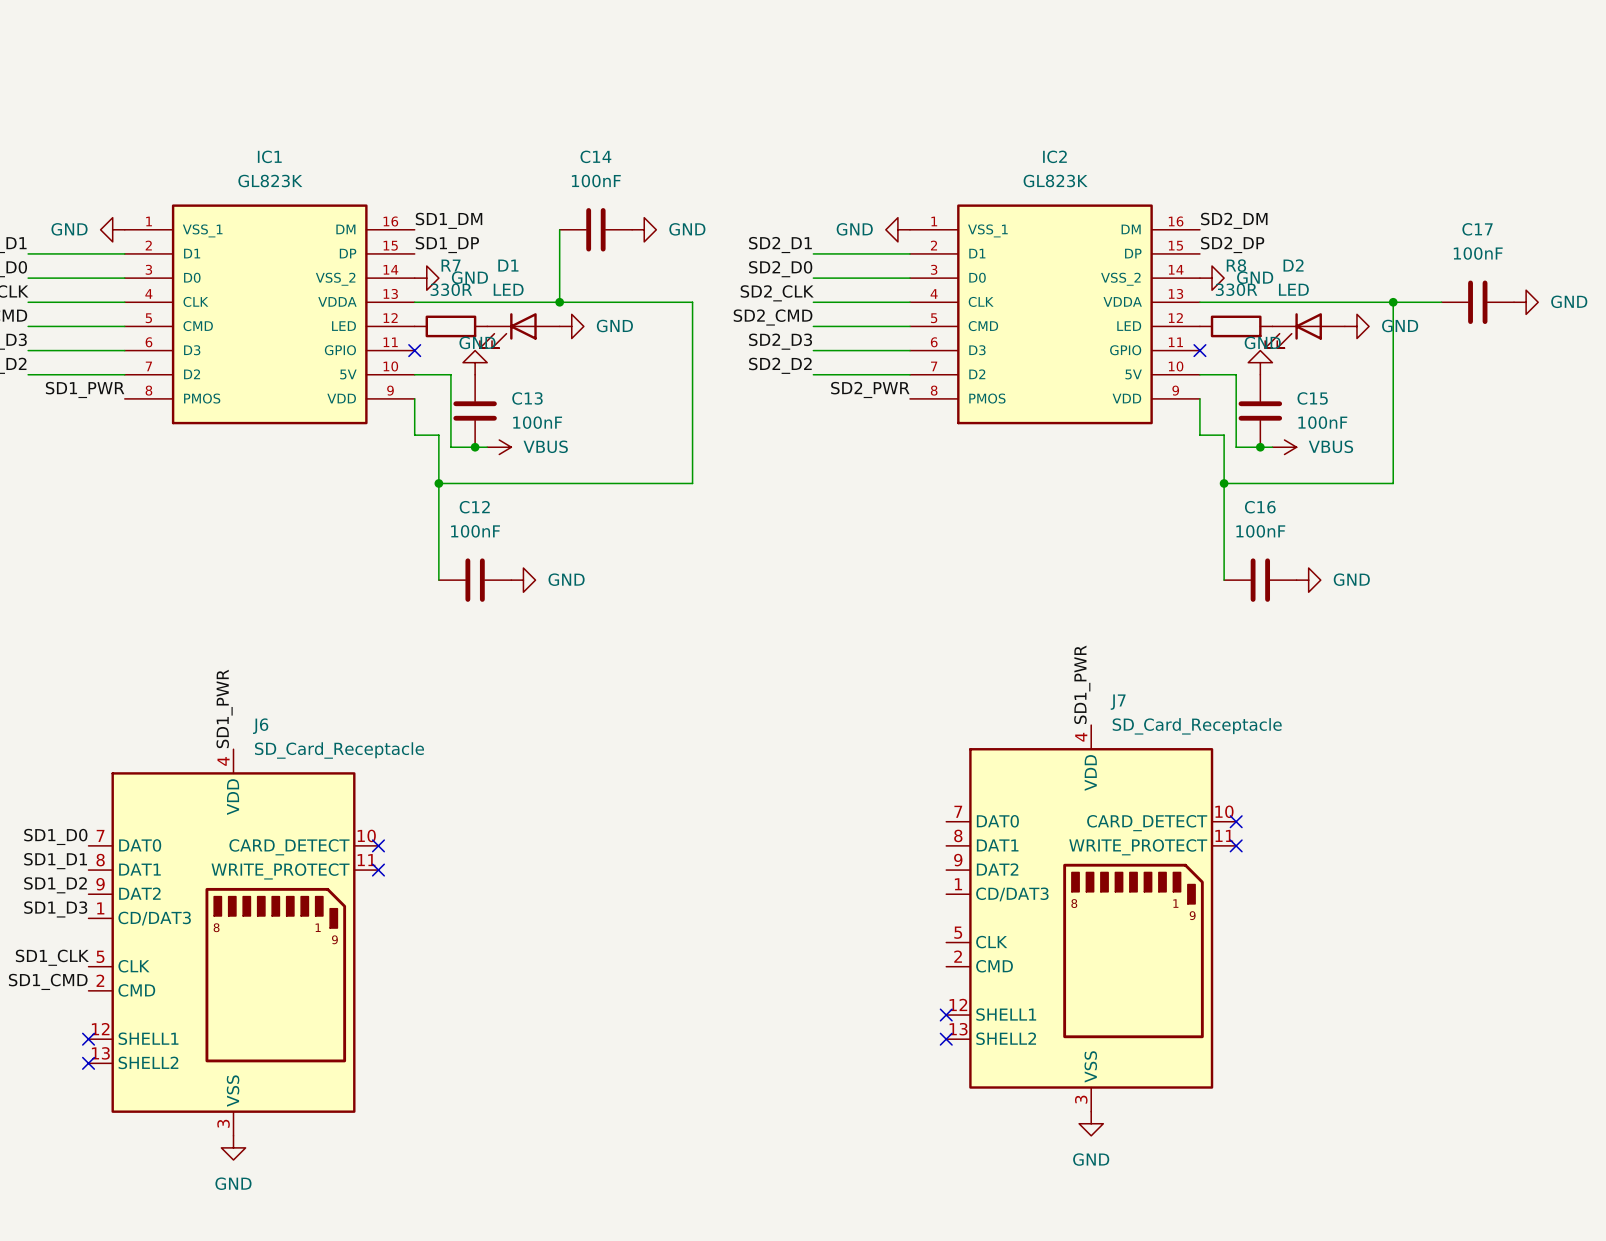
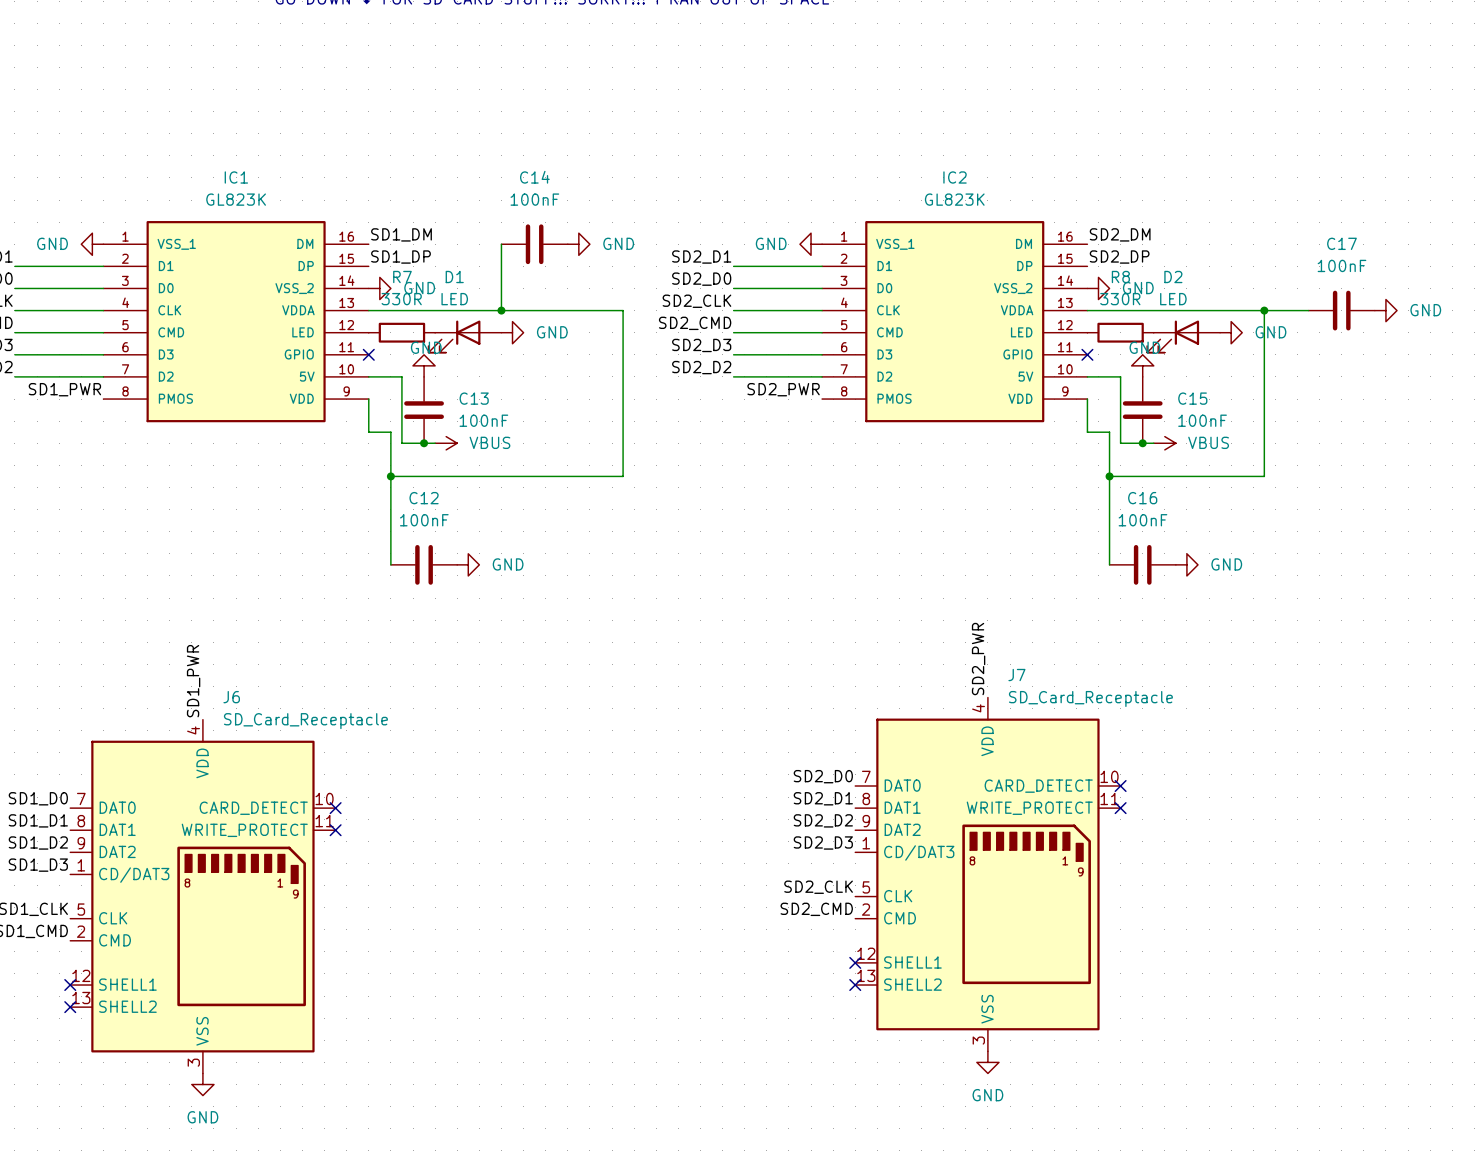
label: SD1_PWR (1082, 684) -> SD2_PWR (978, 659)
label: none -> SD2_D0 (823, 776)
label: none -> SD2_D1 (823, 798)
label: none -> SD2_D2 (823, 820)
label: none -> SD2_D3 (823, 843)
label: none -> SD2_CLK (818, 887)
label: none -> SD2_CMD (816, 909)

